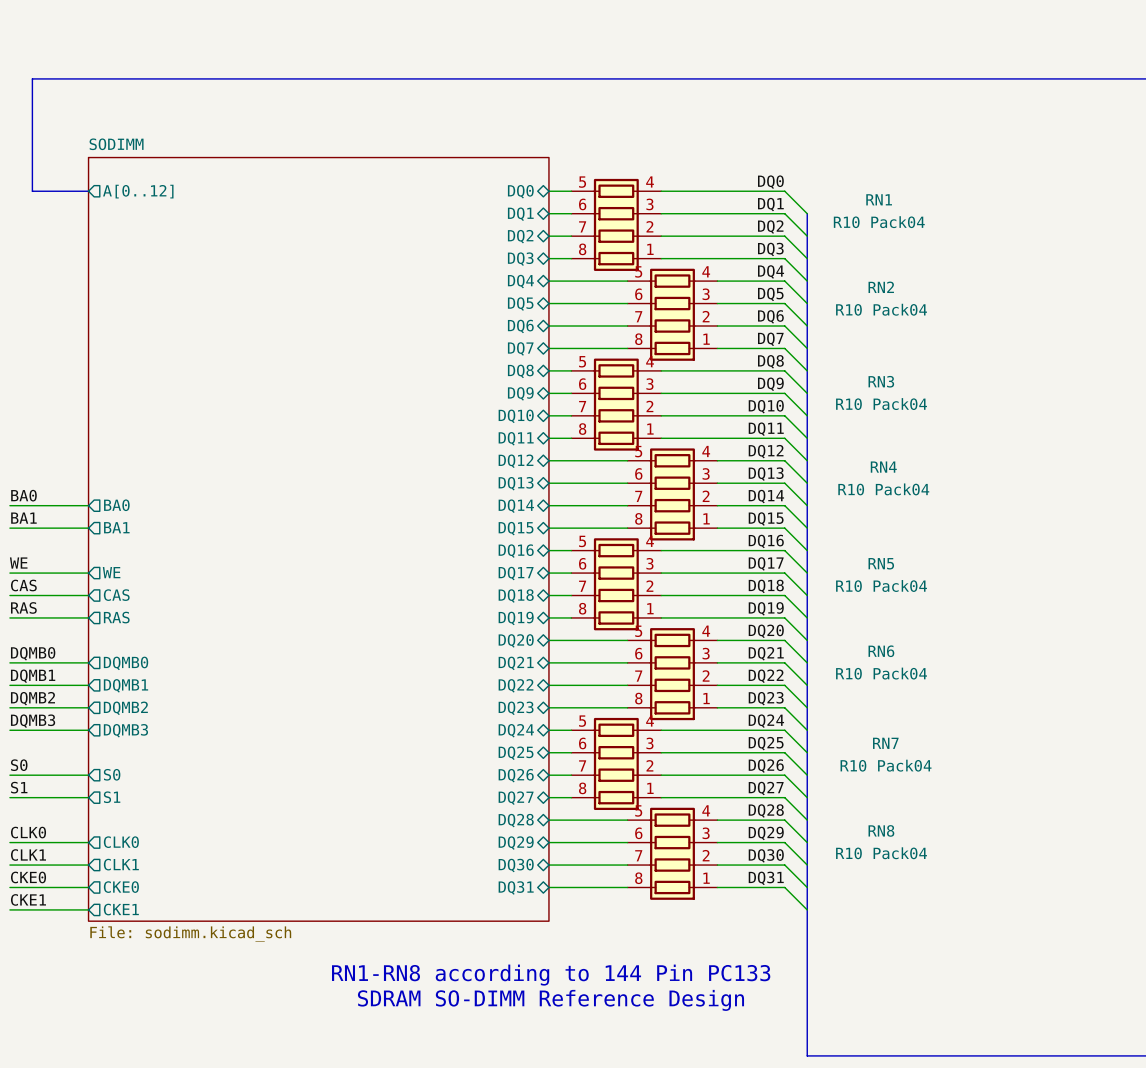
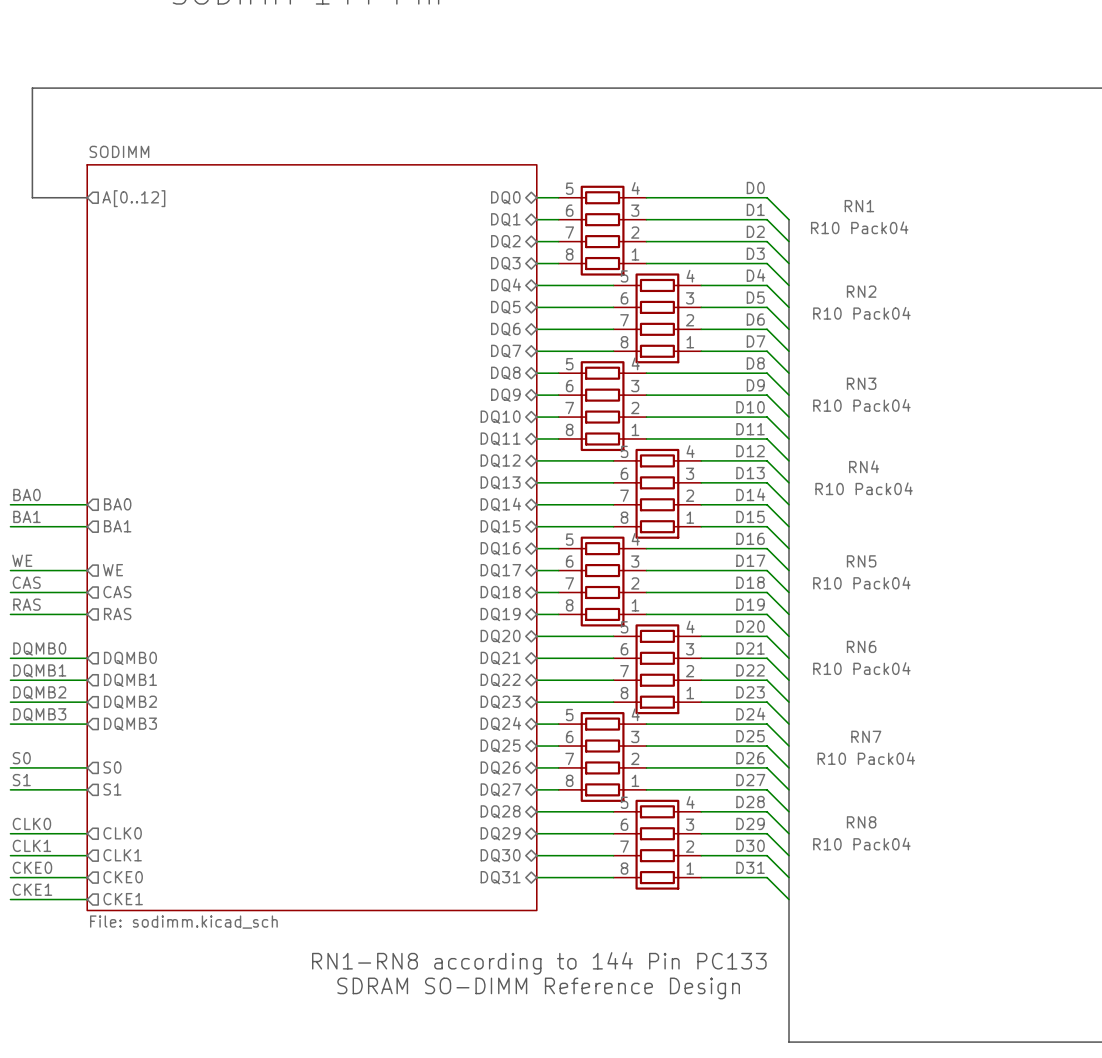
label: DQ0 (770, 182) -> D0 (755, 187)
label: DQ1 (770, 204) -> D1 (755, 209)
label: DQ2 (770, 227) -> D2 (755, 231)
label: DQ3 (770, 249) -> D3 (755, 253)
label: DQ4 (771, 271) -> D4 (756, 275)
label: DQ5 (770, 294) -> D5 (755, 297)
label: DQ6 (770, 316) -> D6 (755, 319)
label: DQ7 (770, 339) -> D7 (756, 341)
label: DQ8 (770, 361) -> D8 (755, 363)
label: DQ9 (770, 384) -> D9 (755, 385)
label: DQ10 (766, 406) -> D10 (750, 407)
label: DQ11 (766, 429) -> D11 (750, 429)
label: DQ12 (766, 451) -> D12 (750, 451)
label: DQ13 (766, 474) -> D13 (750, 473)
label: DQ14 (766, 496) -> D14 (750, 494)
label: DQ15 (766, 519) -> D15 (750, 516)
label: DQ16 (766, 541) -> D16 (750, 538)
label: DQ17 (766, 563) -> D17 (750, 560)
label: DQ18 (766, 586) -> D18 (750, 582)
label: DQ19 (766, 608) -> D19 (750, 604)
label: DQ20 (766, 631) -> D20 (750, 626)
label: DQ21 (766, 653) -> D21 (750, 648)
label: DQ22 (766, 676) -> D22 (750, 670)
label: DQ23 (766, 698) -> D23 (750, 692)
label: DQ24 (766, 721) -> D24 (750, 714)
label: DQ25 (766, 743) -> D25 (750, 736)
label: DQ26 (766, 766) -> D26 (750, 758)
label: DQ27 (766, 788) -> D27 (750, 780)
label: DQ28 (766, 811) -> D28 (750, 802)
label: DQ29 (766, 833) -> D29 (750, 823)
label: DQ30 (766, 855) -> D30 (750, 845)
label: DQ31 (766, 878) -> D31 (750, 867)

